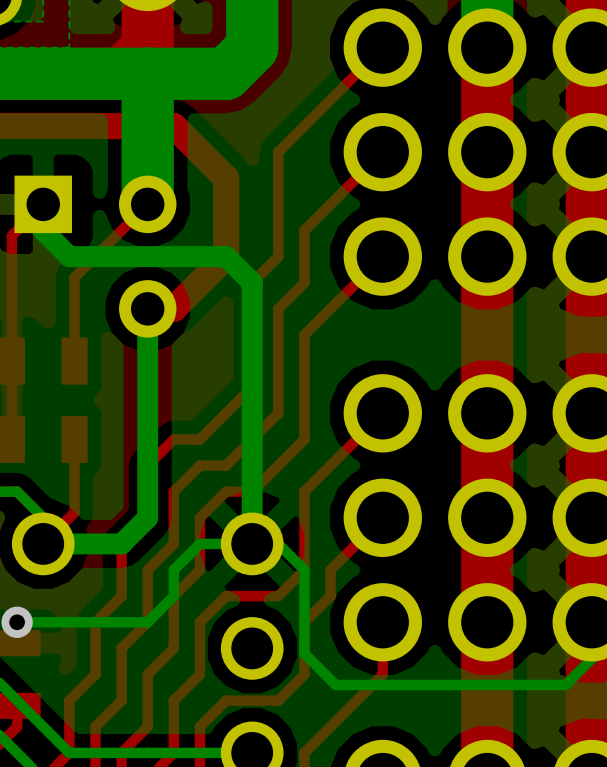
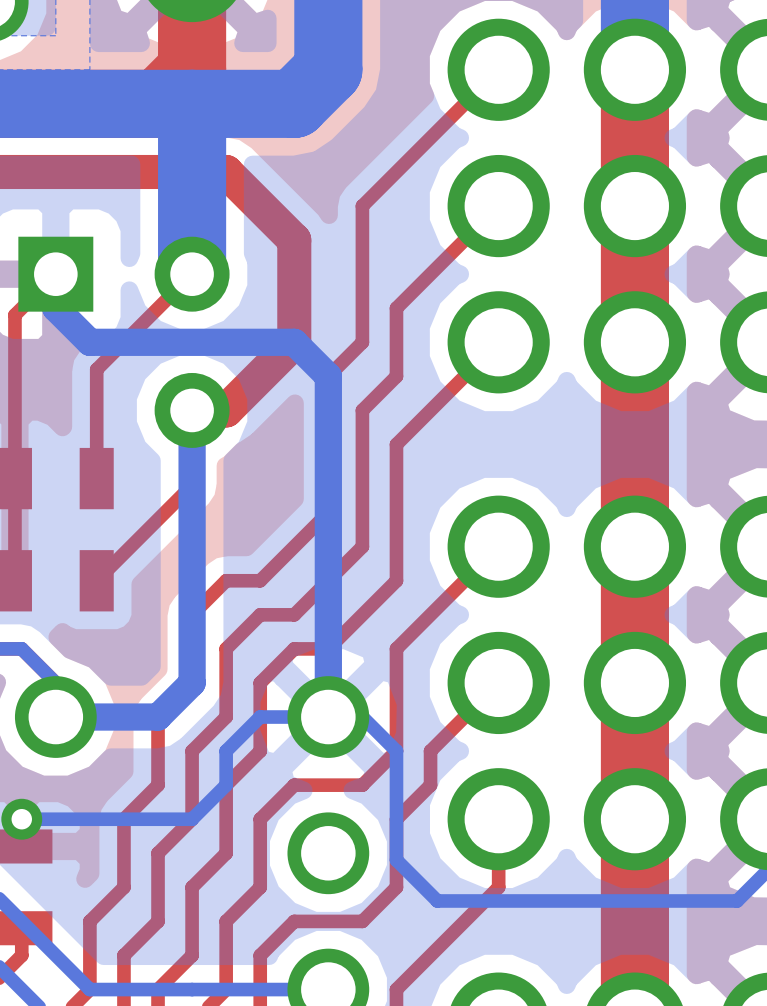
top track: (74, 439) (74, 512) (43, 543) -> (96, 580) (192, 485) (192, 410)

